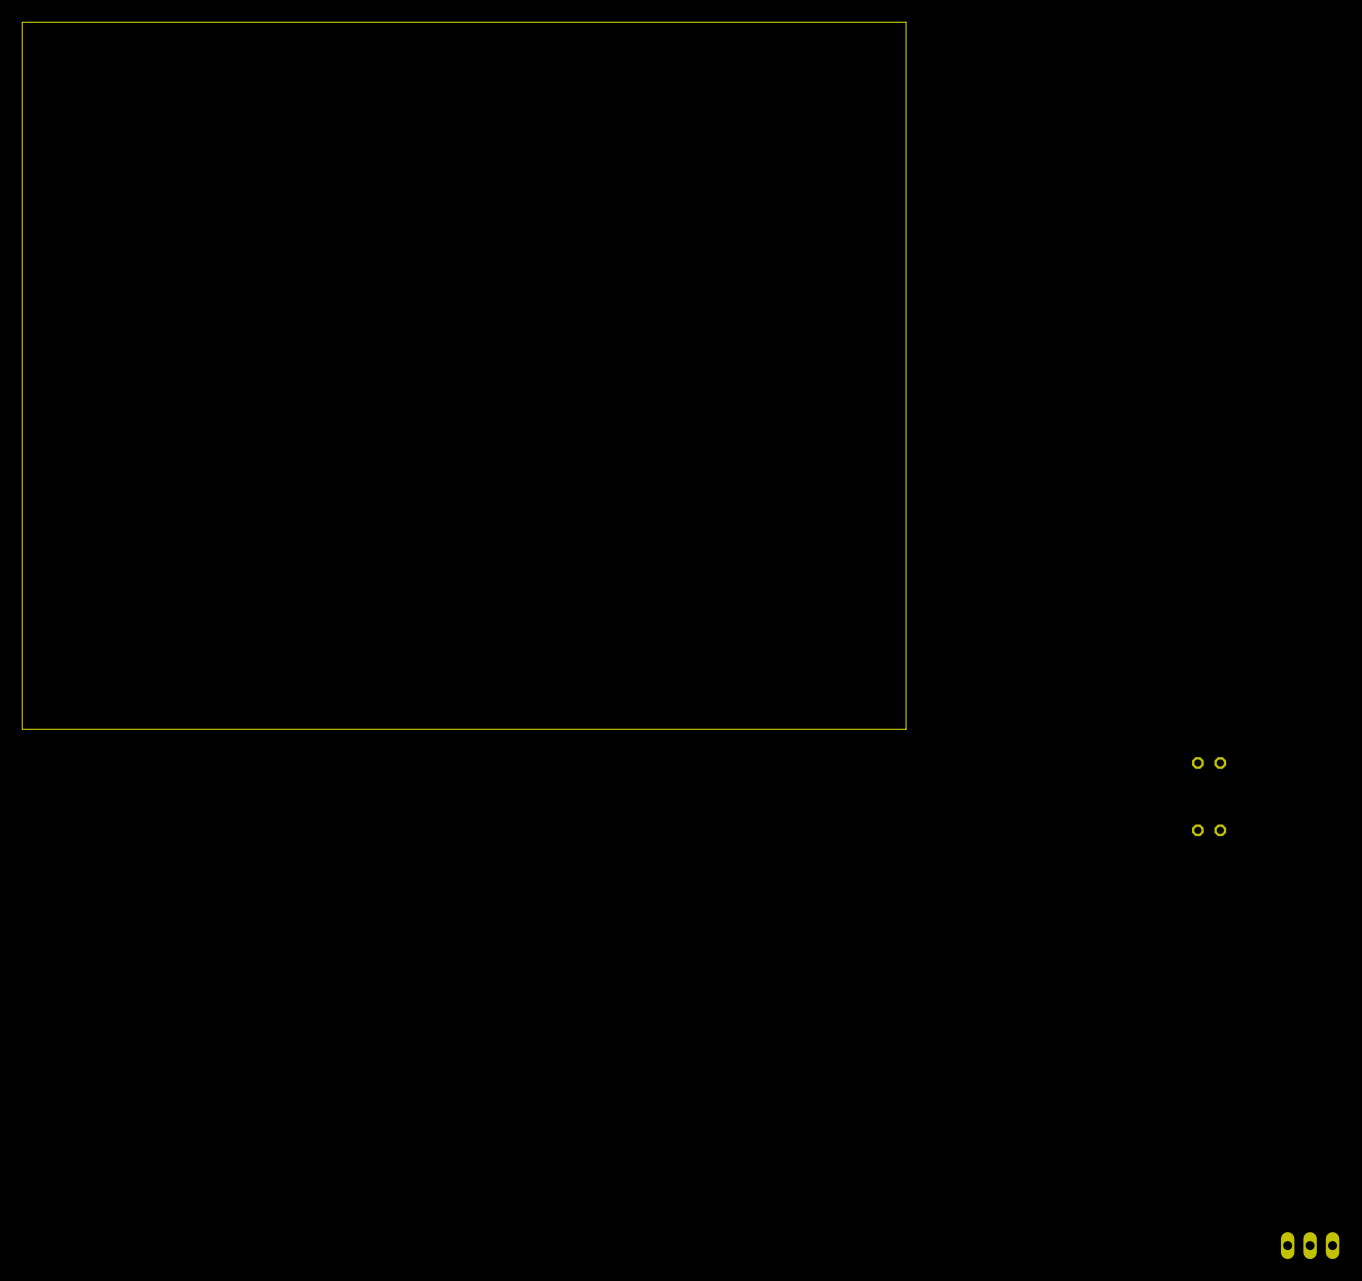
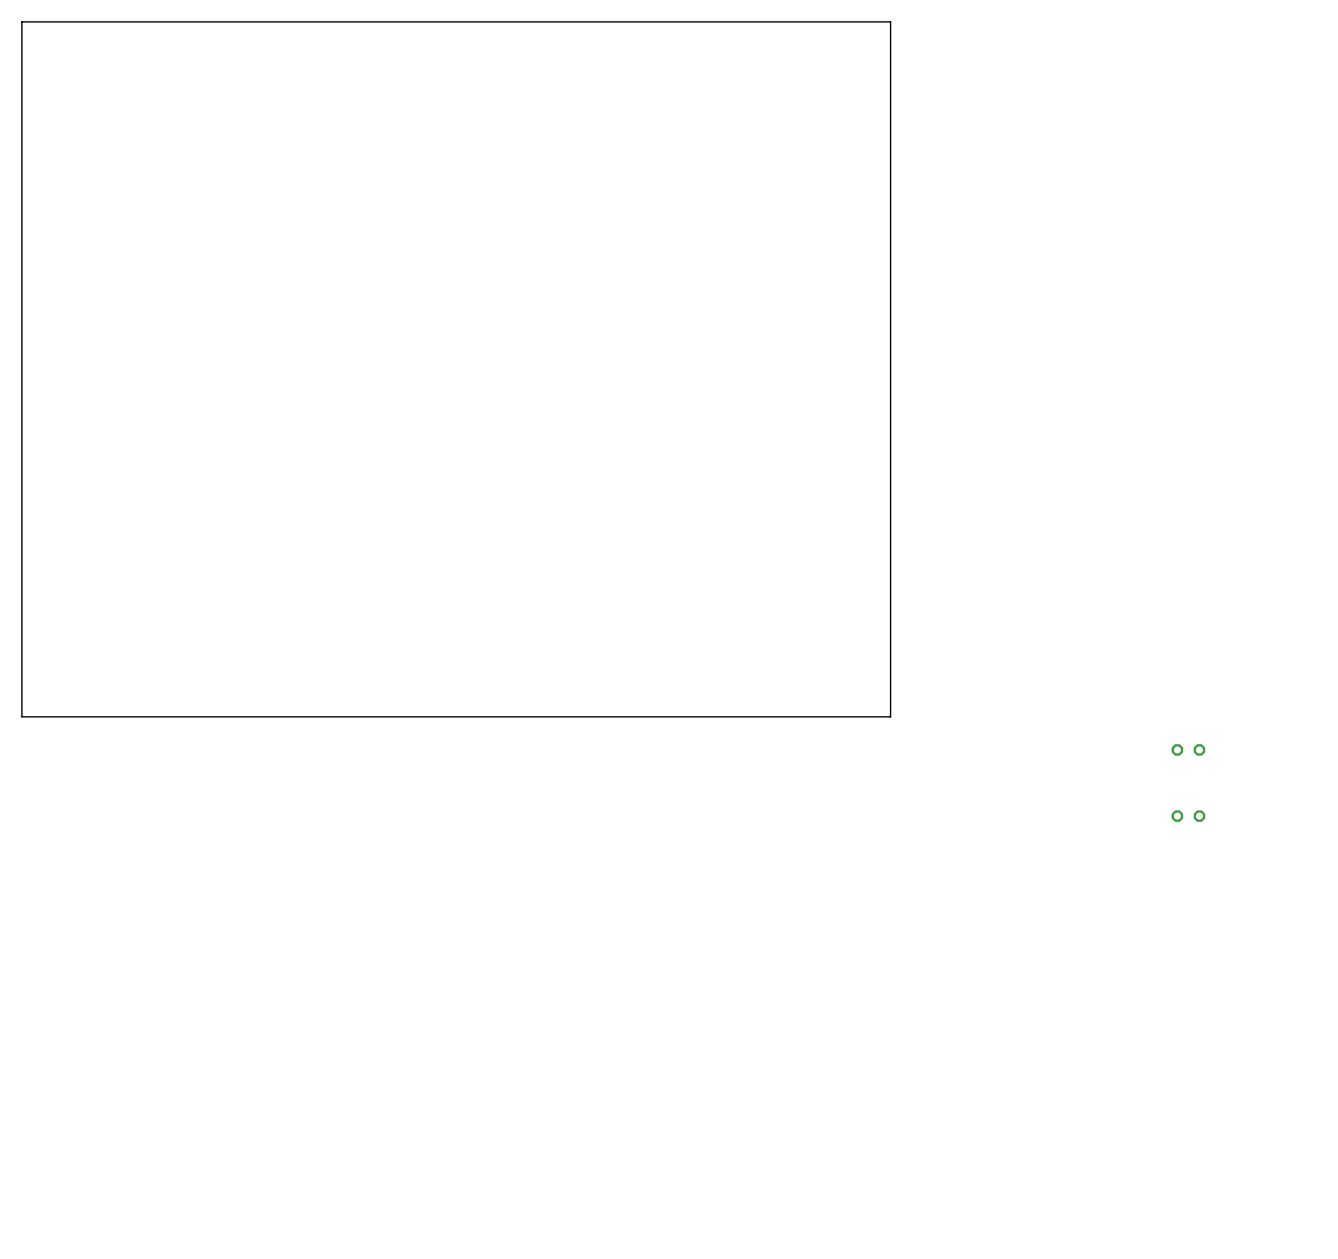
part: (1310, 1245) -> none

